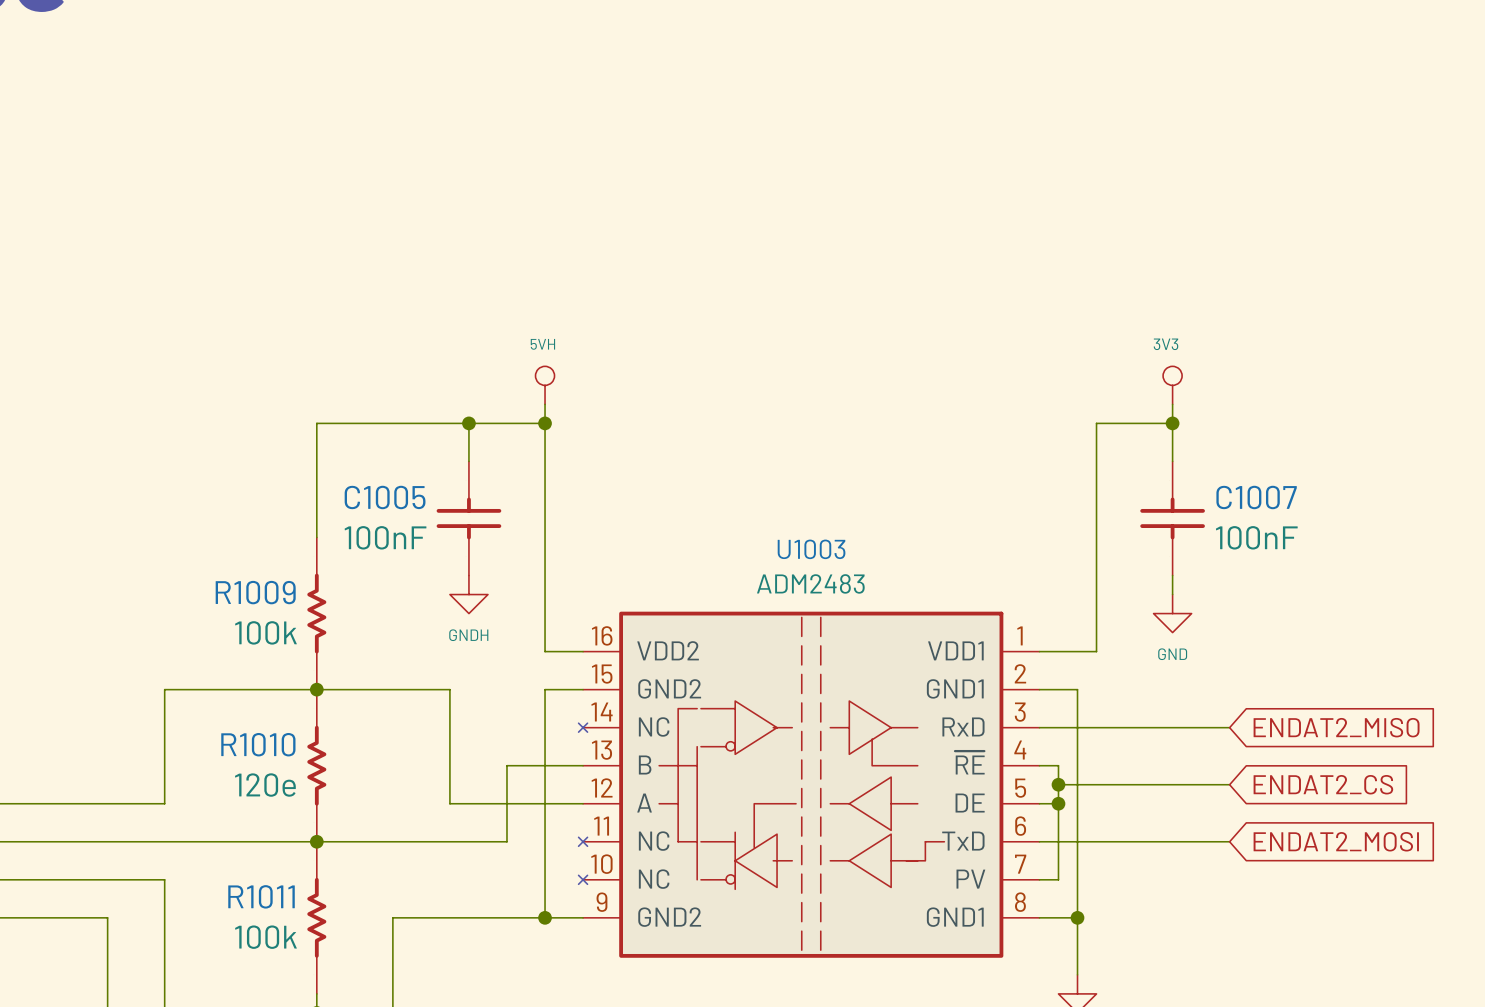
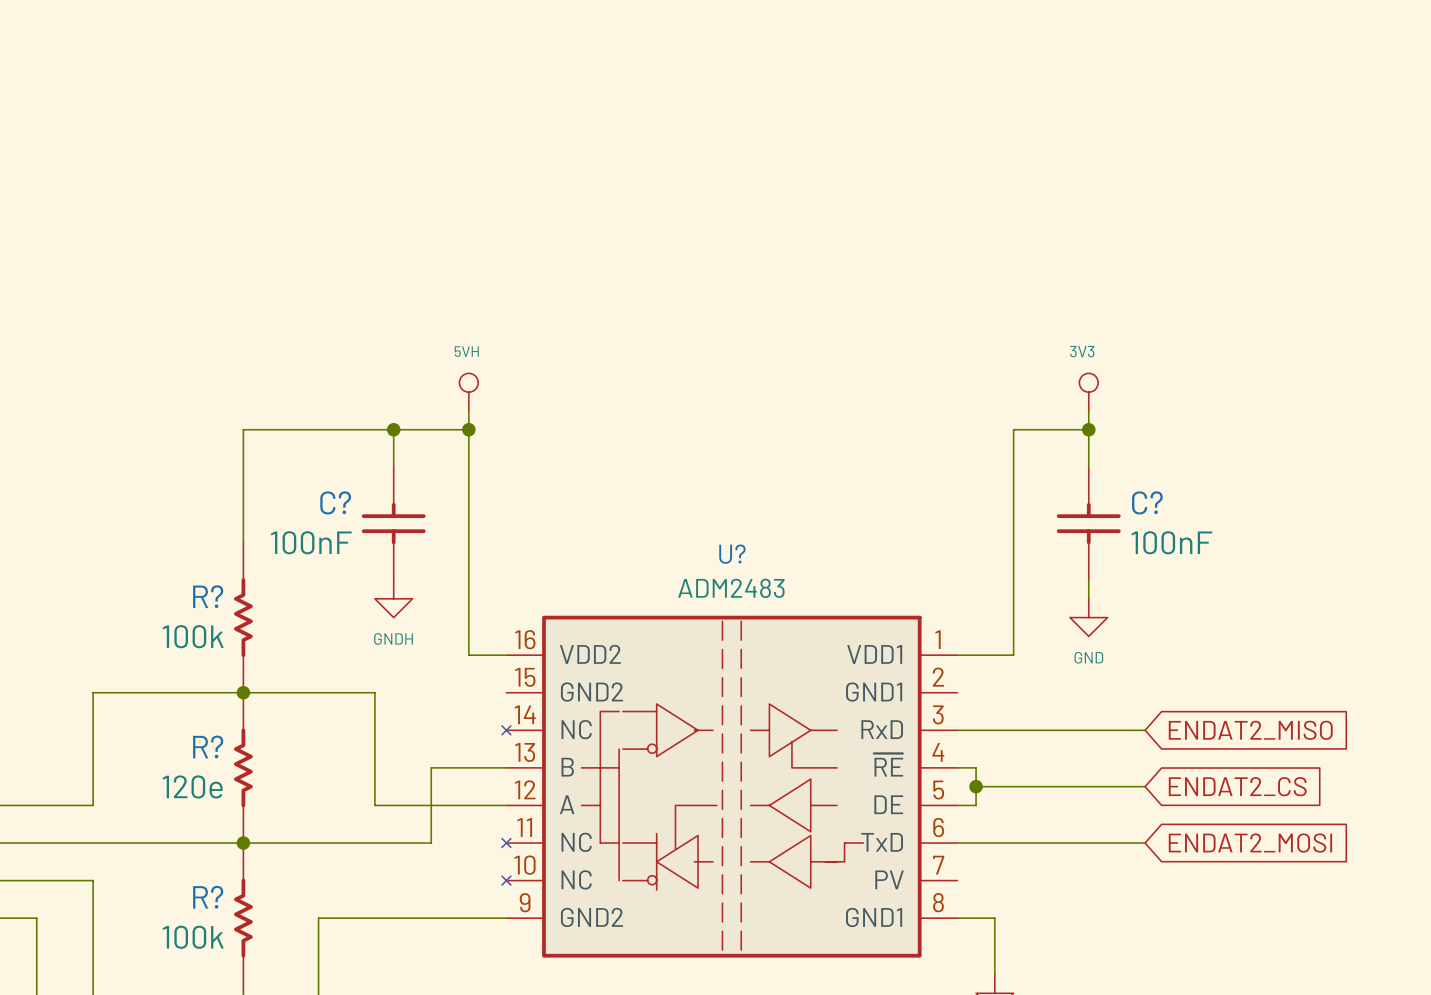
C1005 name: C1005 (385, 497) -> C? (335, 502)
C1007 name: C1007 (1256, 497) -> C? (1147, 502)
U1003 name: U1003 (811, 549) -> U? (732, 554)
R1009 name: R1009 (255, 592) -> R? (208, 596)
wire: (583, 689) (545, 689) (545, 917) -> none
wire: (1039, 689) (1077, 689) (1077, 917) -> none
R1010 name: R1010 (258, 744) -> R? (208, 746)
wire: (1058, 803) (1058, 879) (1039, 879) -> none
junction: (1058, 803) -> none
R1011 name: R1011 (261, 896) -> R? (208, 897)
junction: (545, 917) -> none
junction: (1077, 917) -> none

